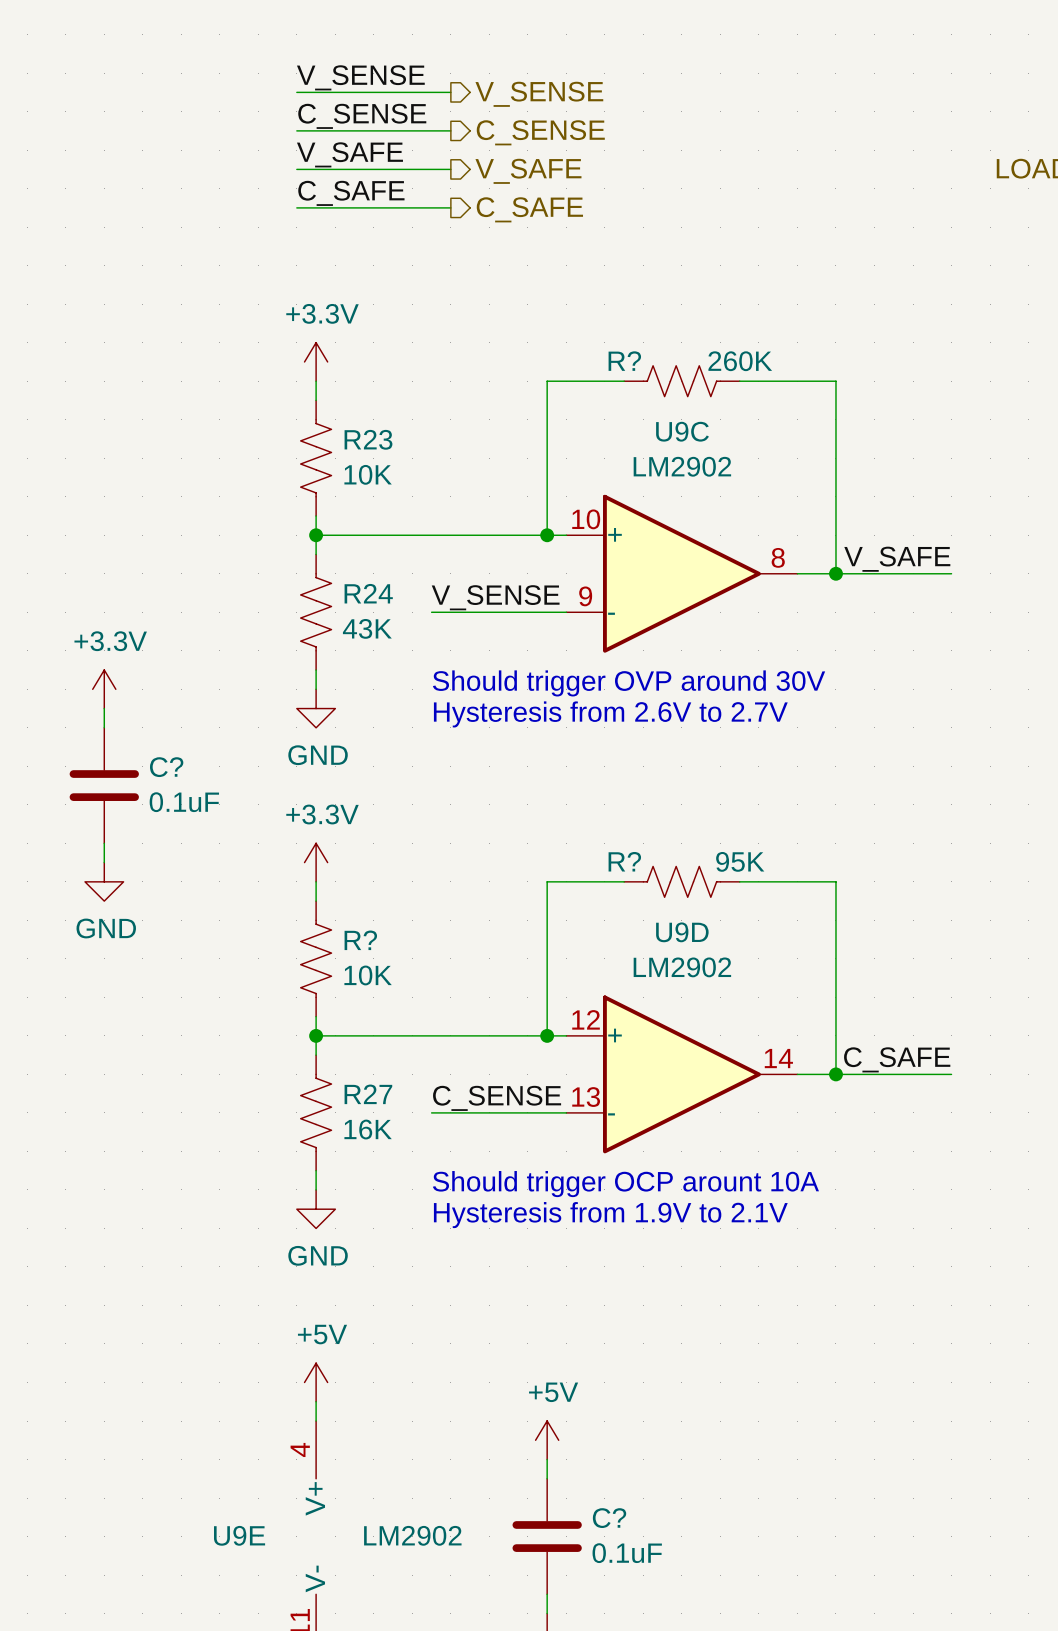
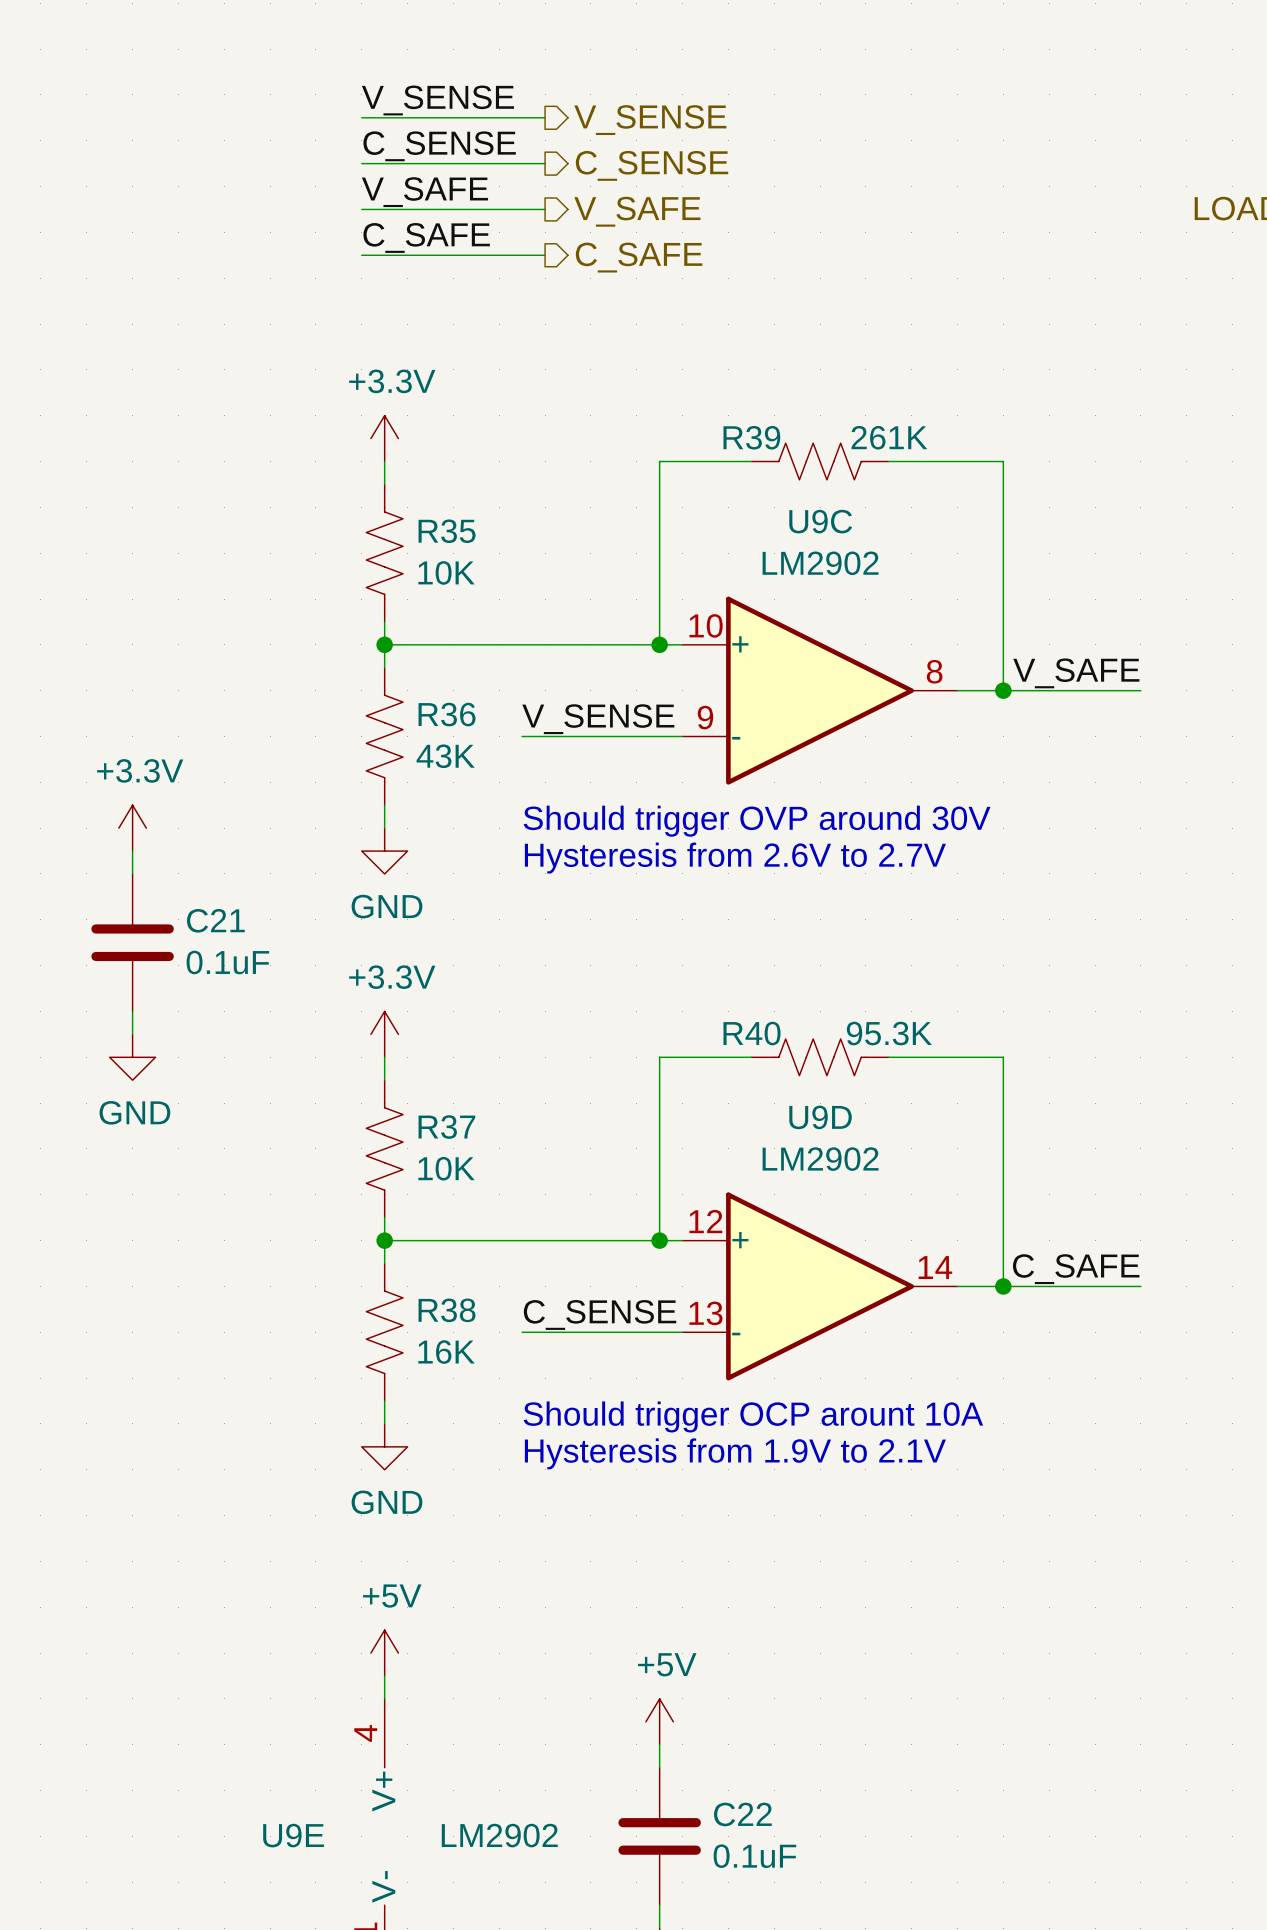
R? name: R? (624, 361) -> R39 (751, 437)
R? value: 260K (740, 361) -> 261K (889, 437)
R23 name: R23 (368, 439) -> R35 (447, 531)
R24 name: R24 (368, 593) -> R36 (447, 714)
C? name: C? (166, 767) -> C21 (215, 920)
R? name: R? (624, 861) -> R40 (752, 1033)
R? value: 95K (740, 861) -> 95.3K (889, 1033)
R? name: R? (360, 940) -> R37 (446, 1127)
R27 name: R27 (368, 1094) -> R38 (447, 1310)
C? name: C? (609, 1518) -> C22 (742, 1814)

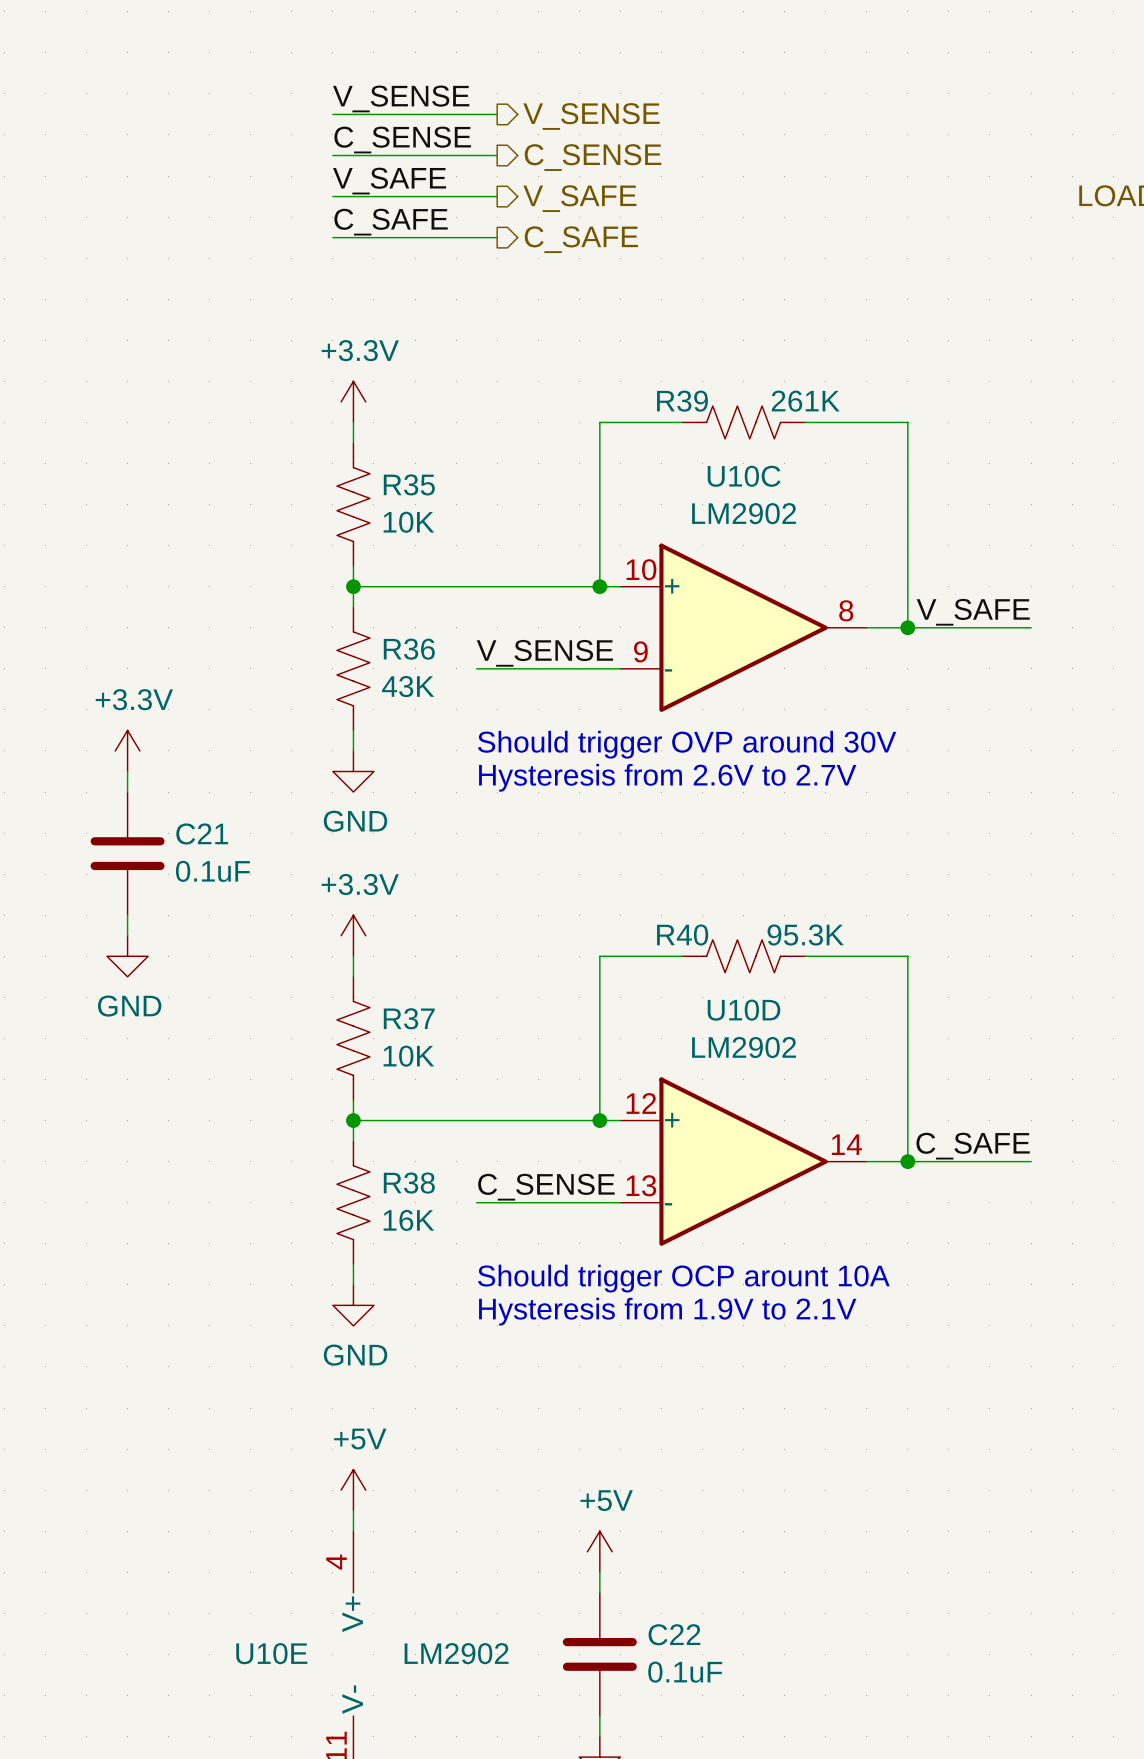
U9C name: U9C (820, 521) -> U10C (744, 476)
U9D name: U9D (820, 1117) -> U10D (744, 1010)
U9E name: U9E (293, 1835) -> U10E (271, 1653)

